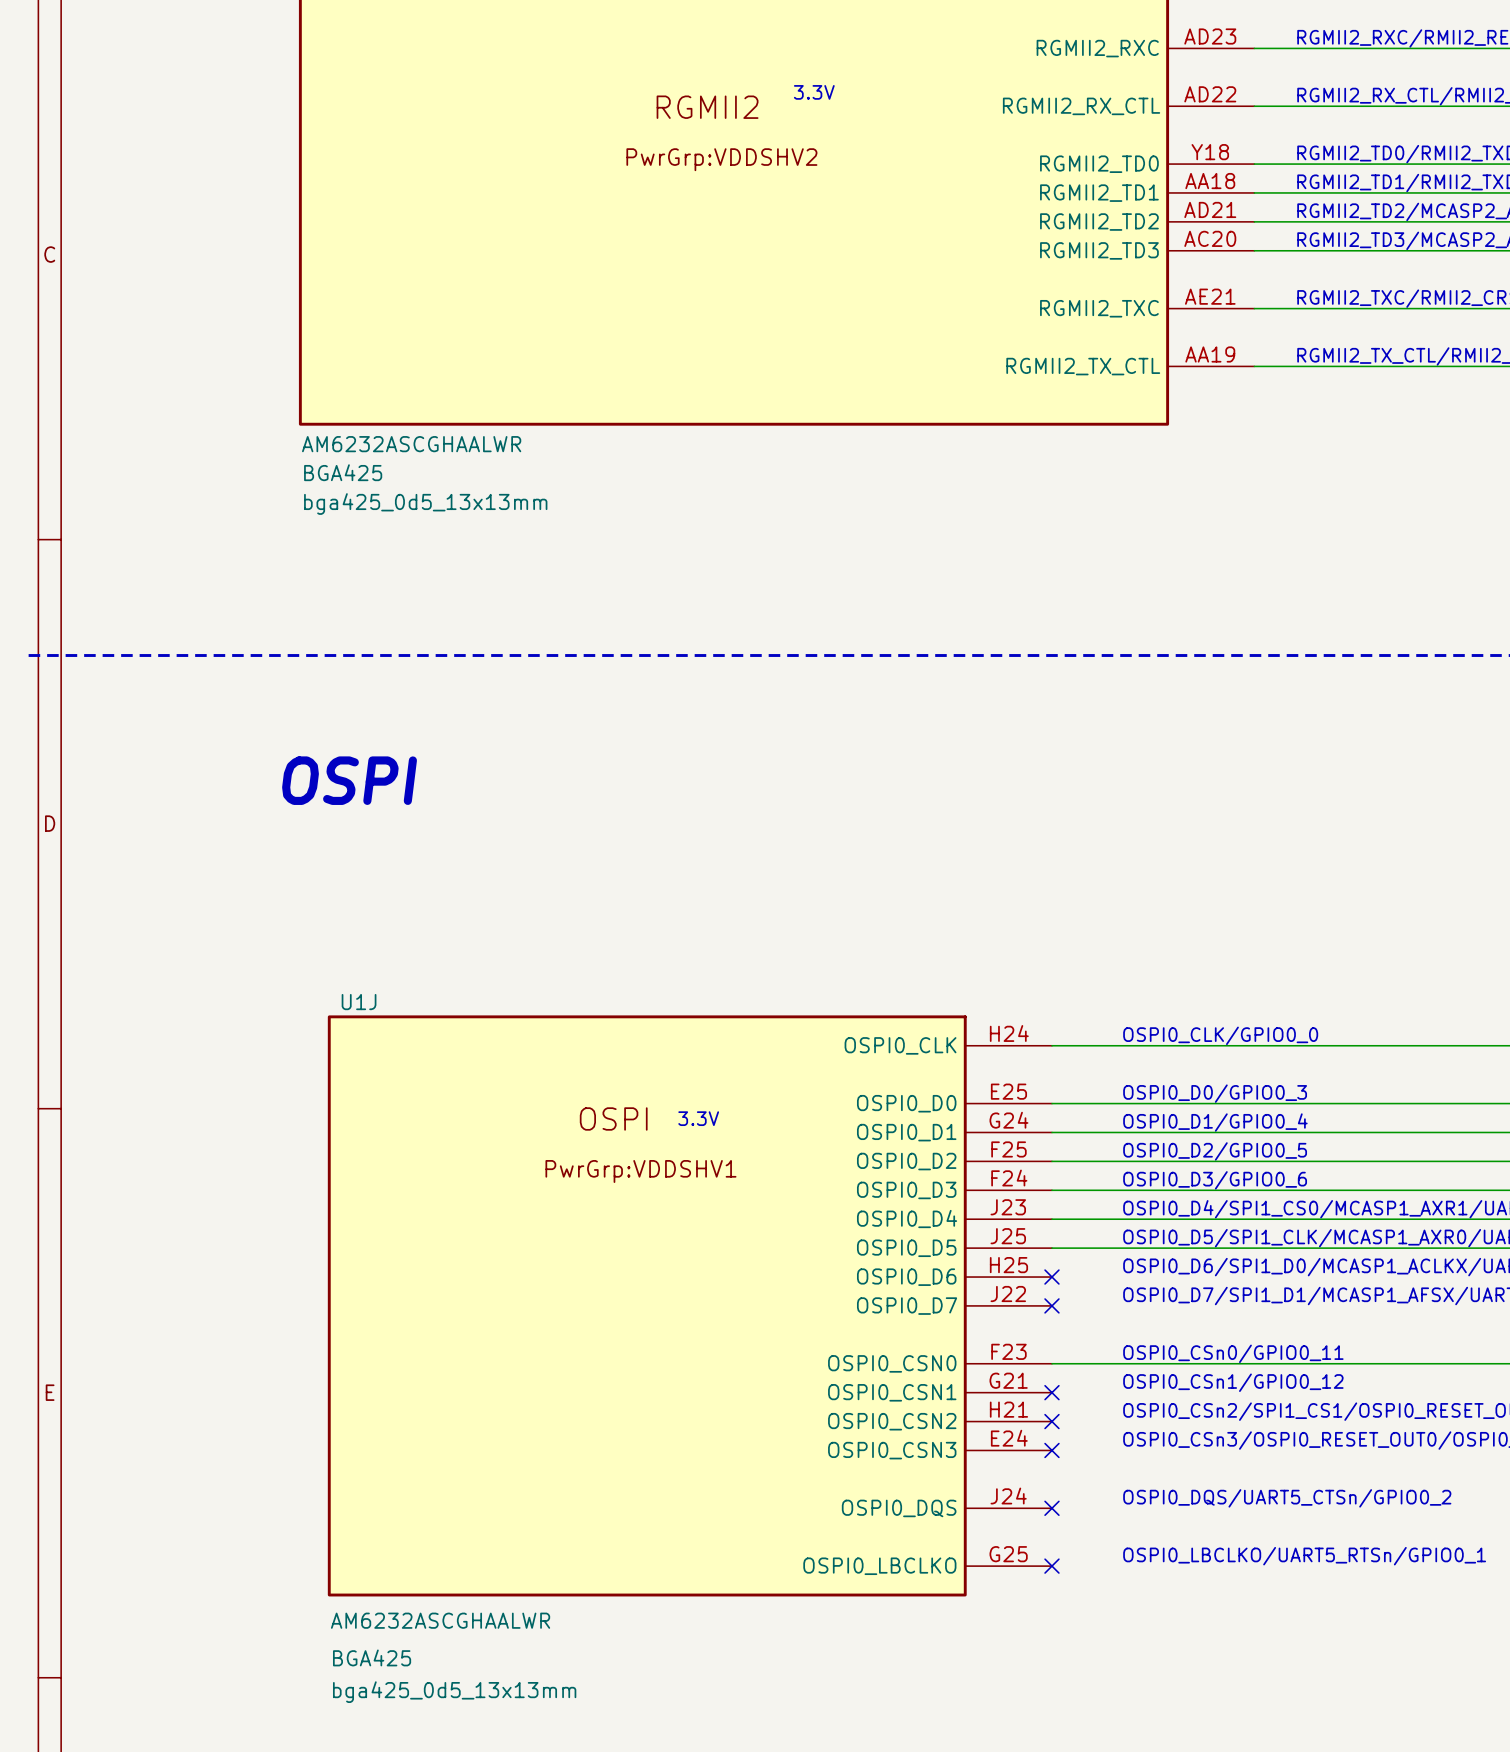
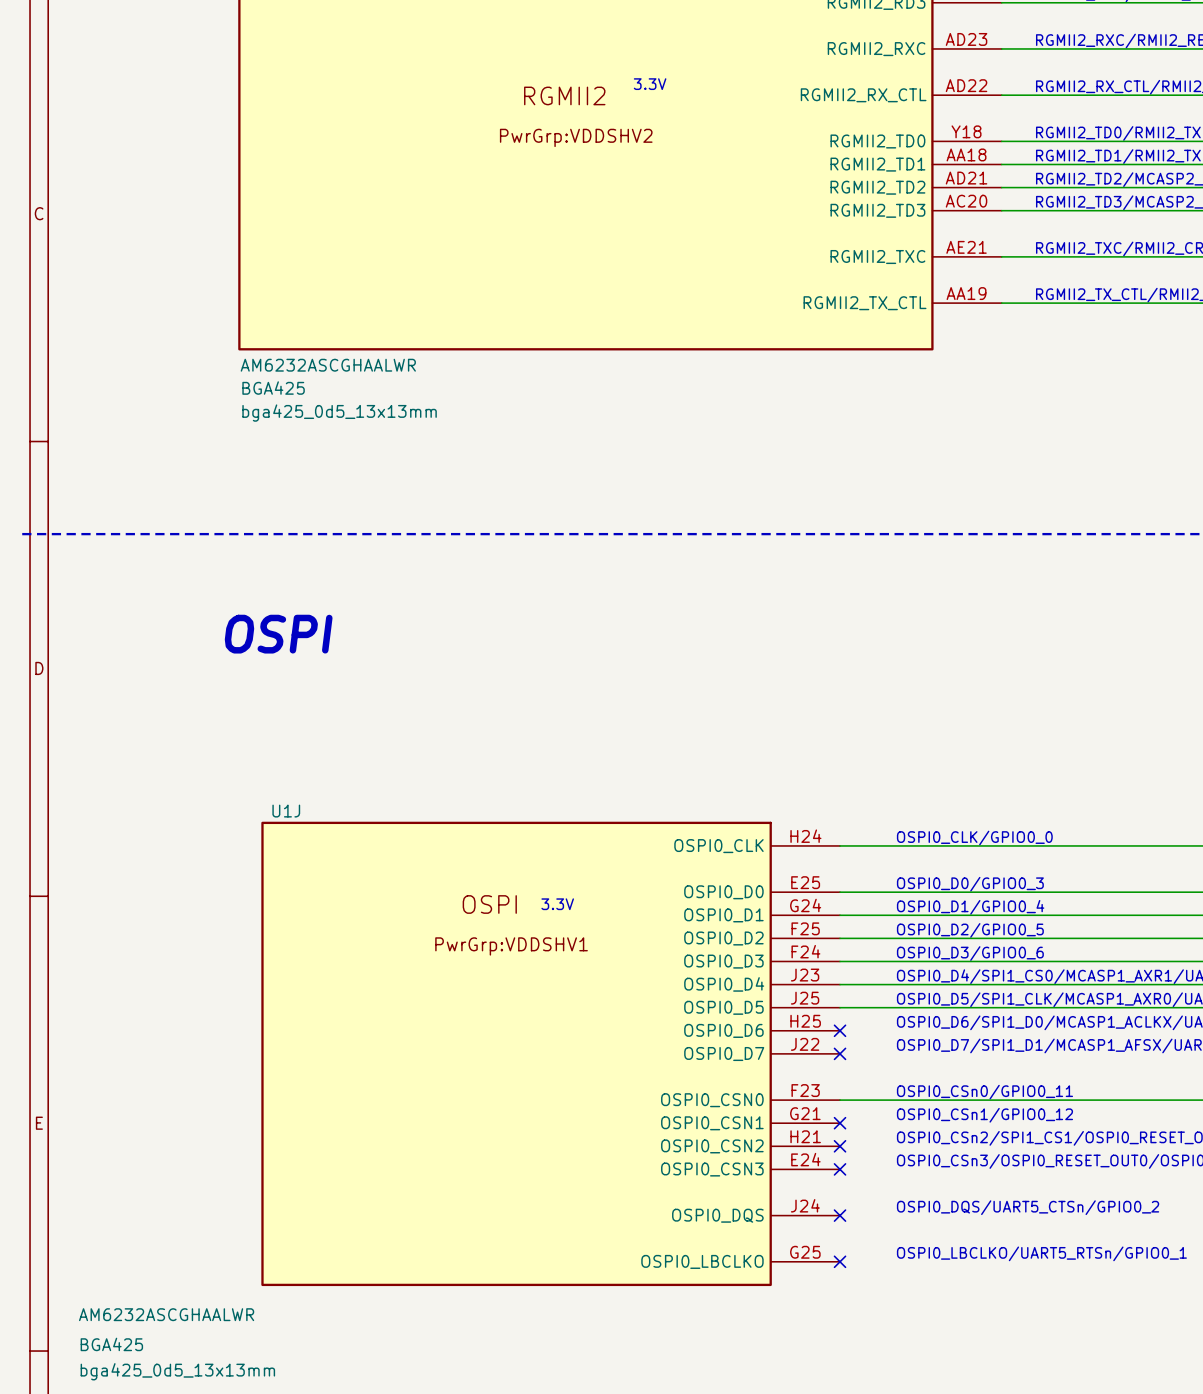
U1J value position: AM6232ASCGHAALWR (440, 1620) -> AM6232ASCGHAALWR (166, 1314)
U1J text position: BGA425 (372, 1657) -> BGA425 (111, 1344)
U1J text position: bga425_0d5_13x13mm (454, 1692) -> bga425_0d5_13x13mm (177, 1371)

